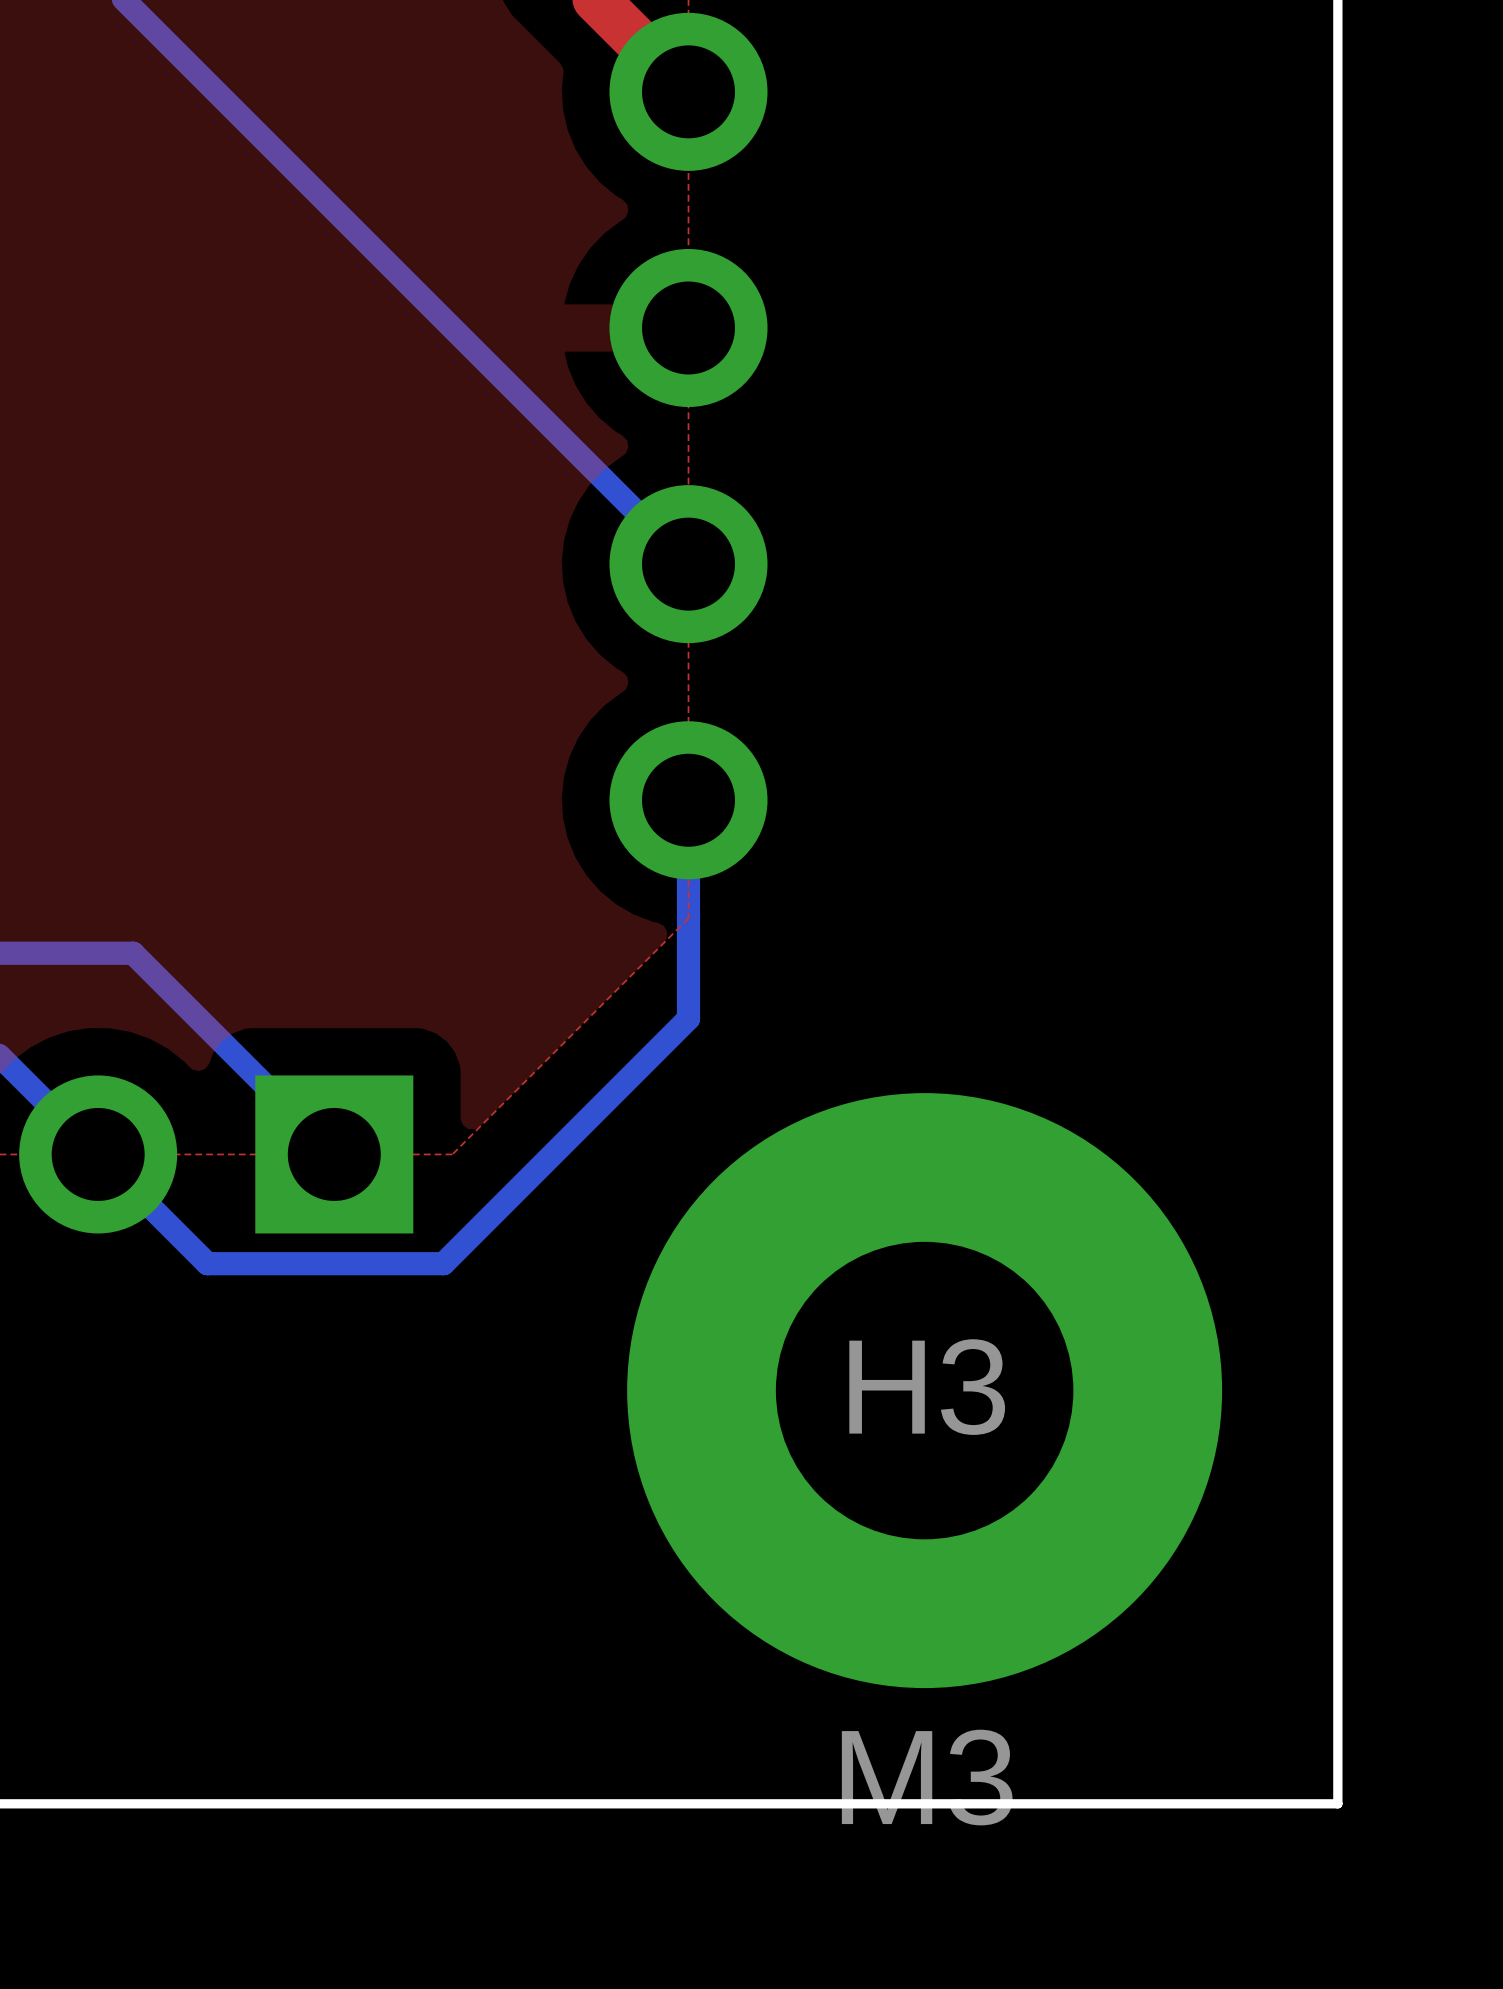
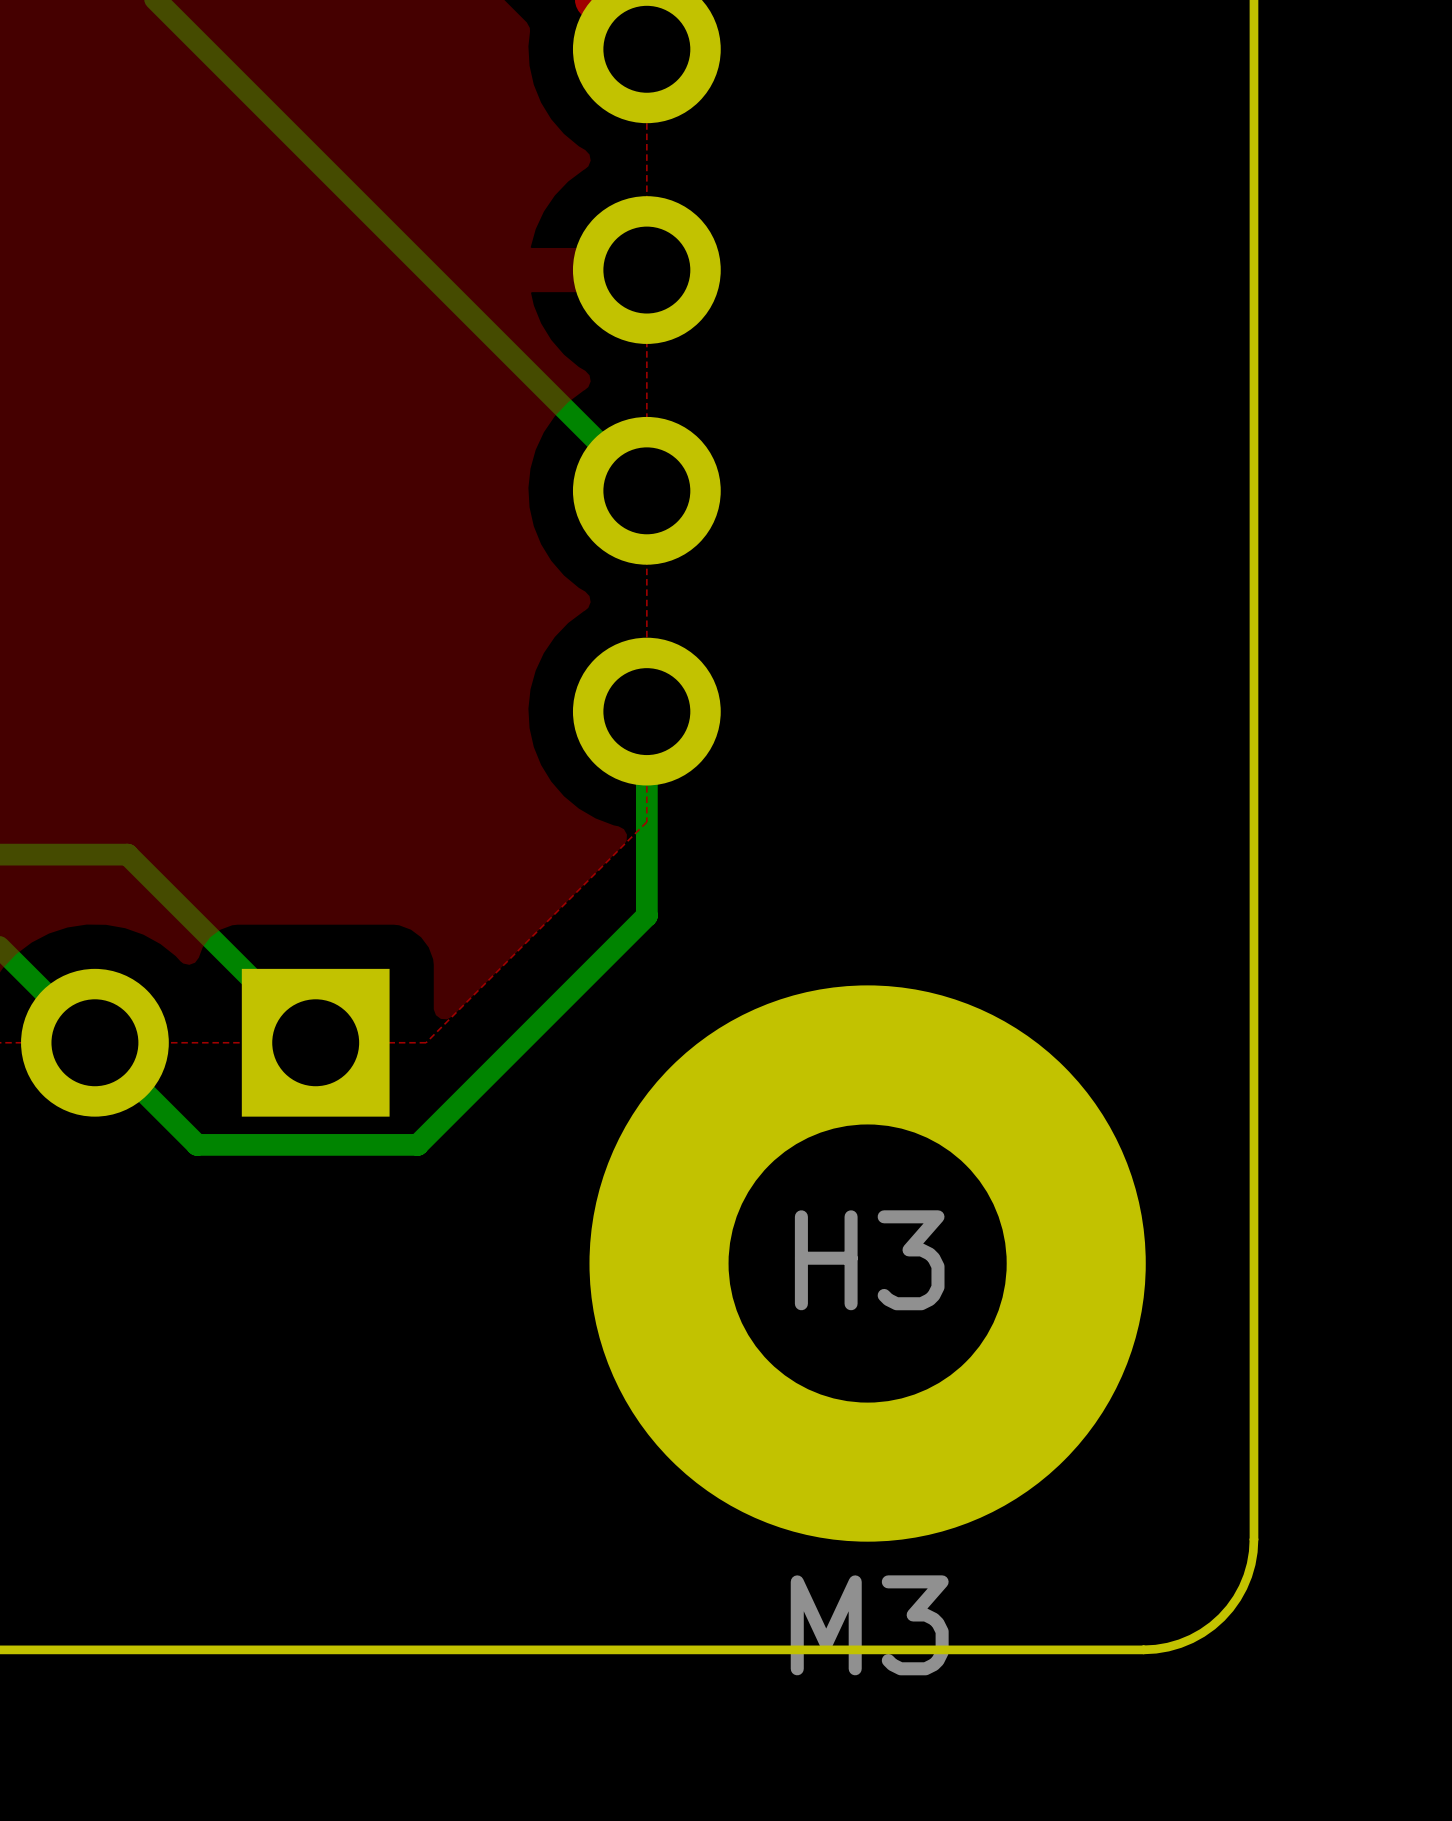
board edge: (1337, 1685) (1337, 1803) (1219, 1803) -> (1253, 1539) (1251, 1564) (1243, 1587) (1221, 1617) (1191, 1638) (1168, 1647) (1143, 1649)

